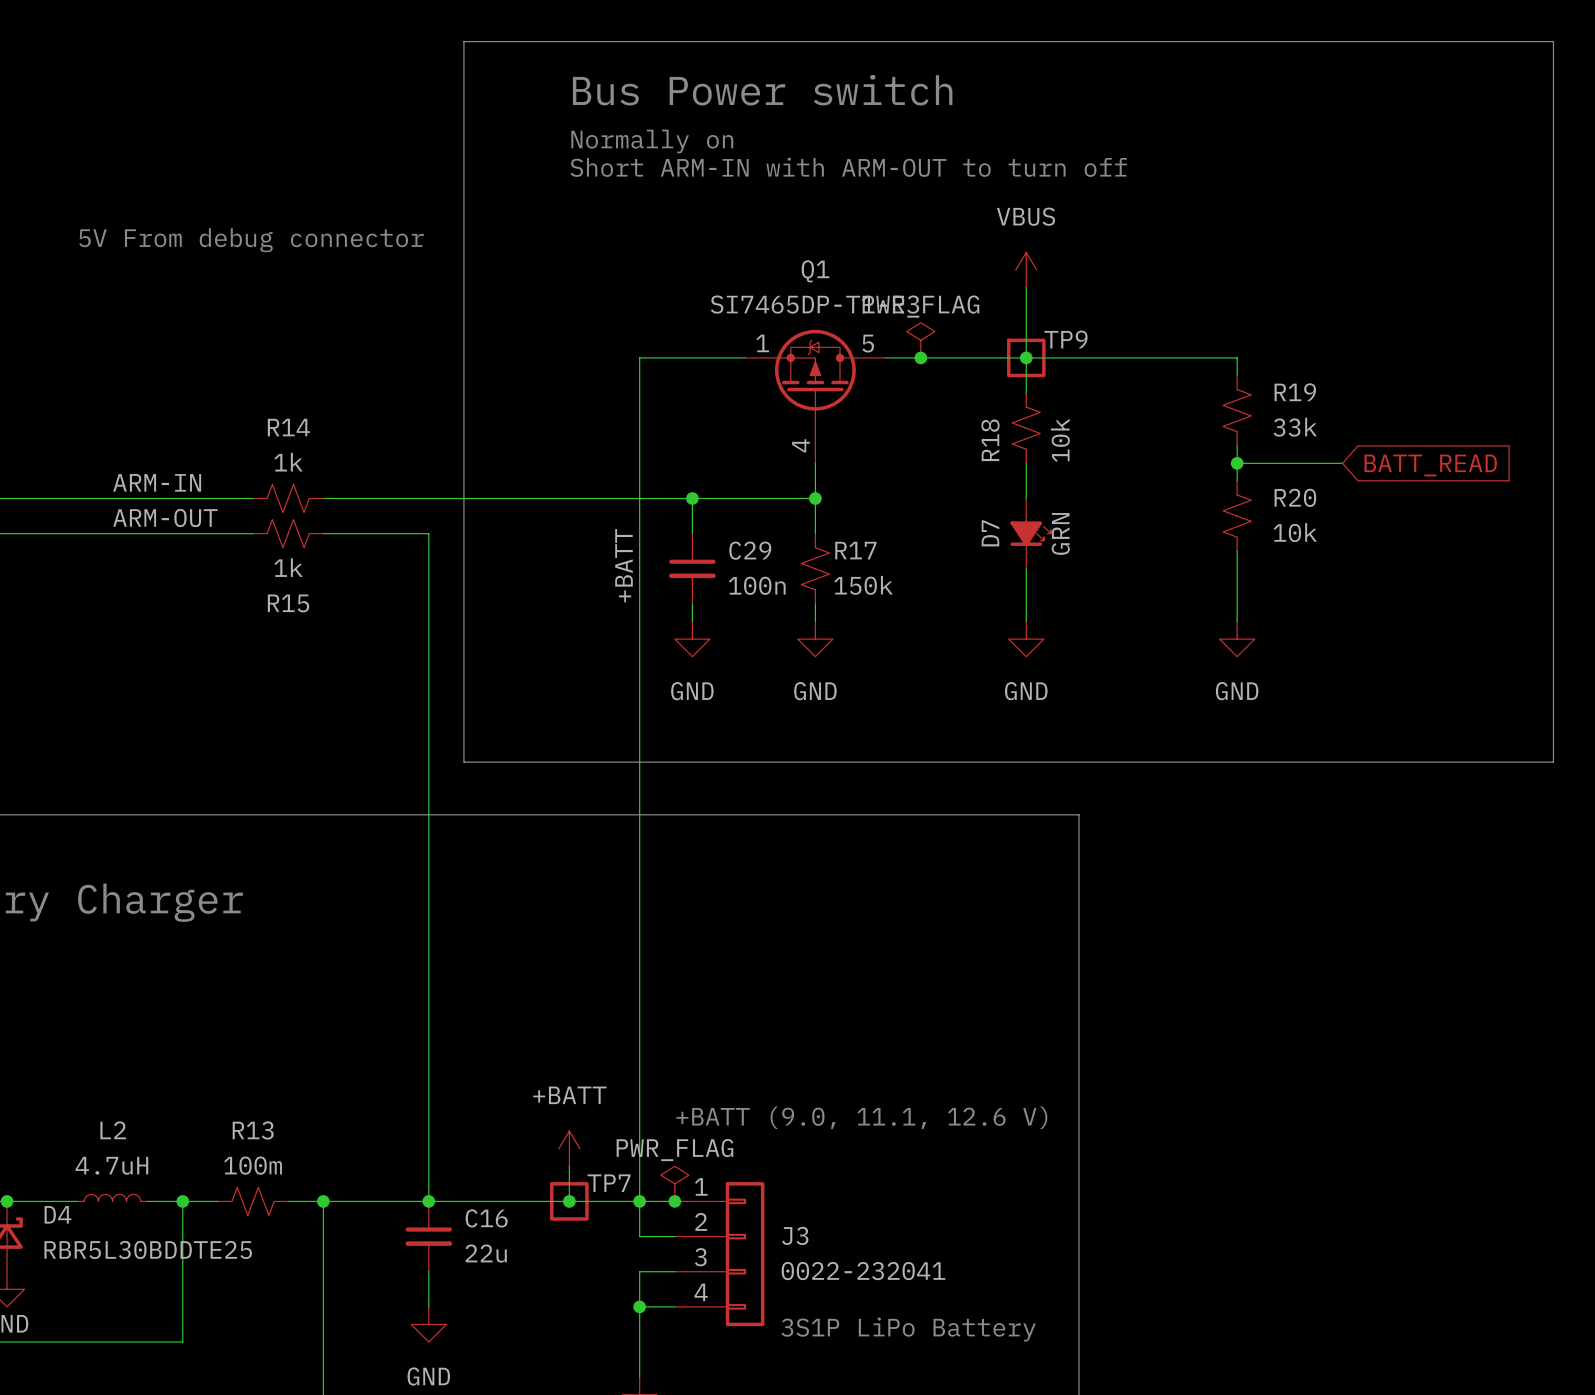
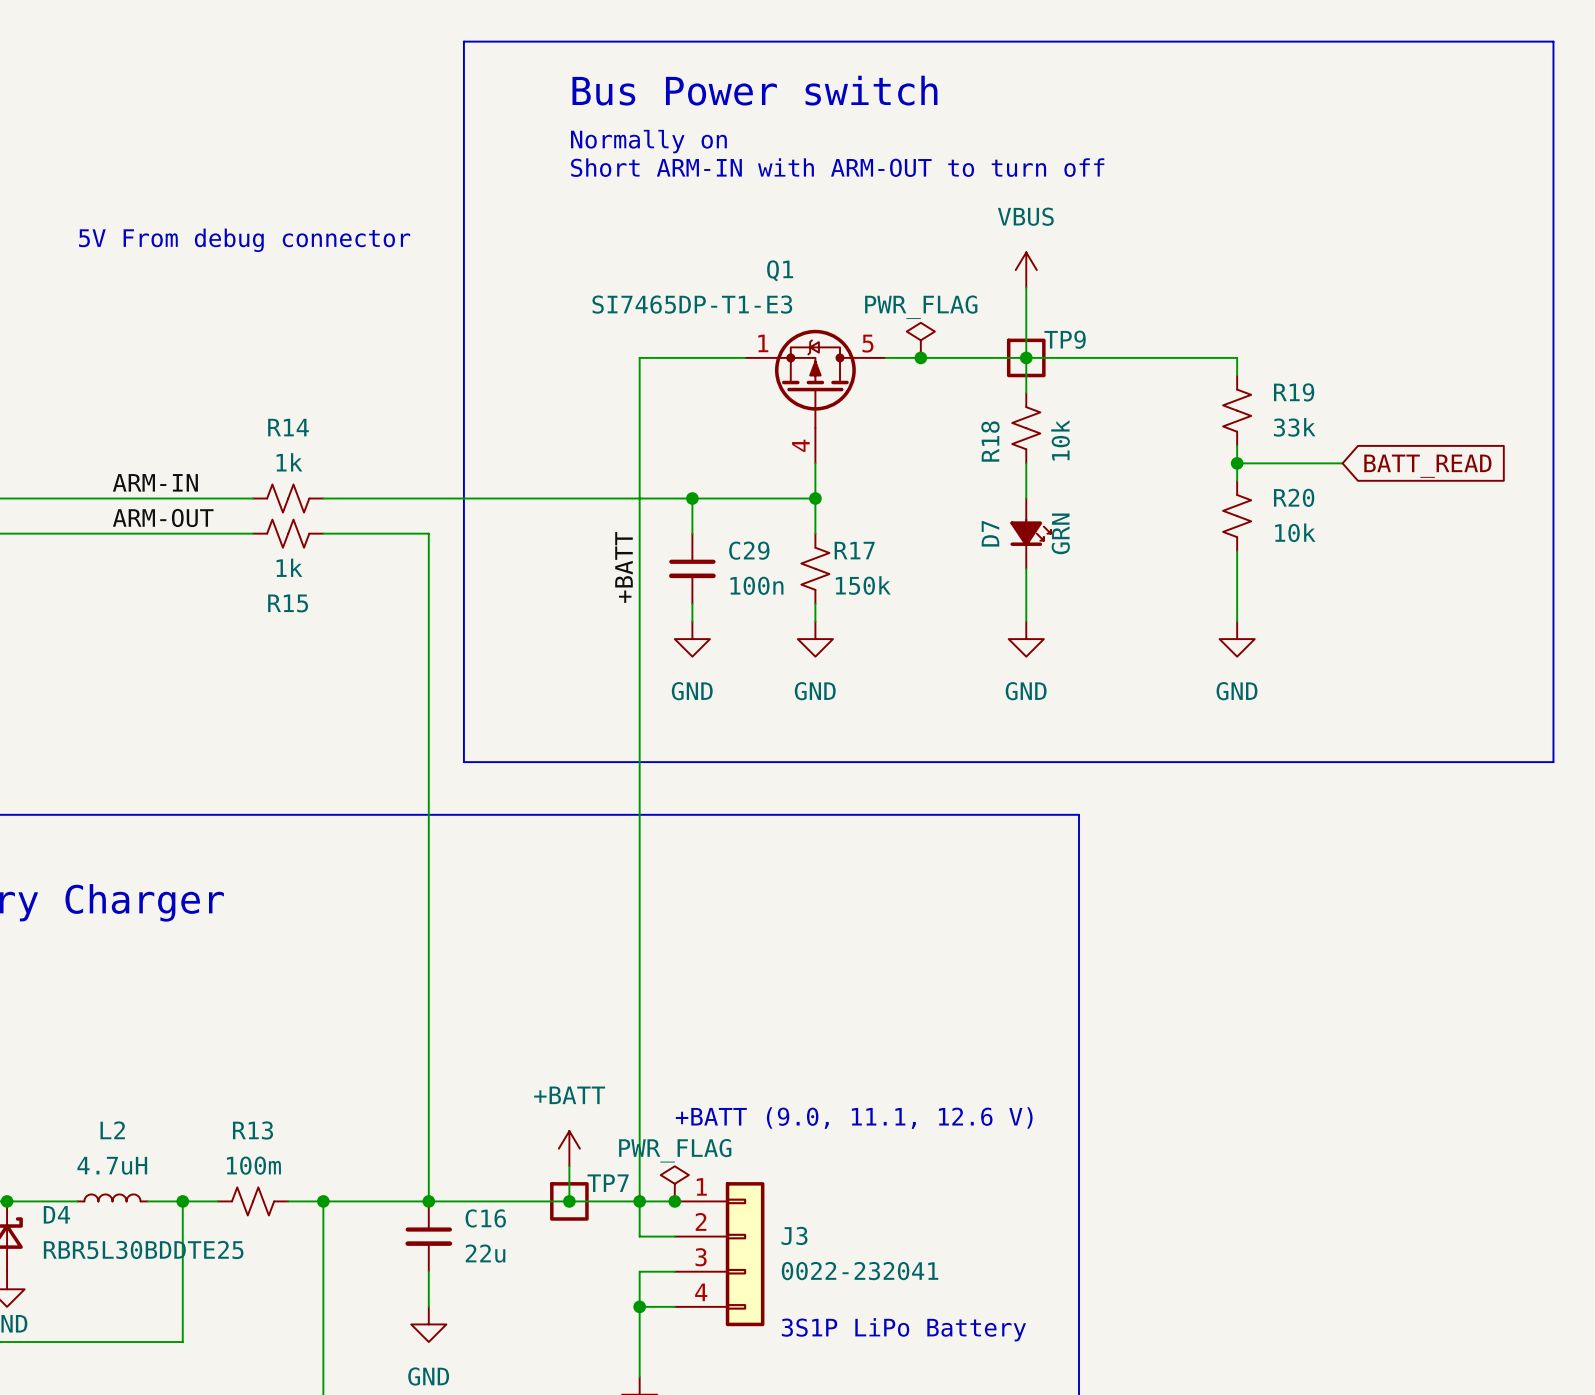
Q1 name position: Q1 (815, 271) -> Q1 (780, 270)
Q1 value position: SI7465DP-T1-E3 (814, 304) -> SI7465DP-T1-E3 (692, 304)

